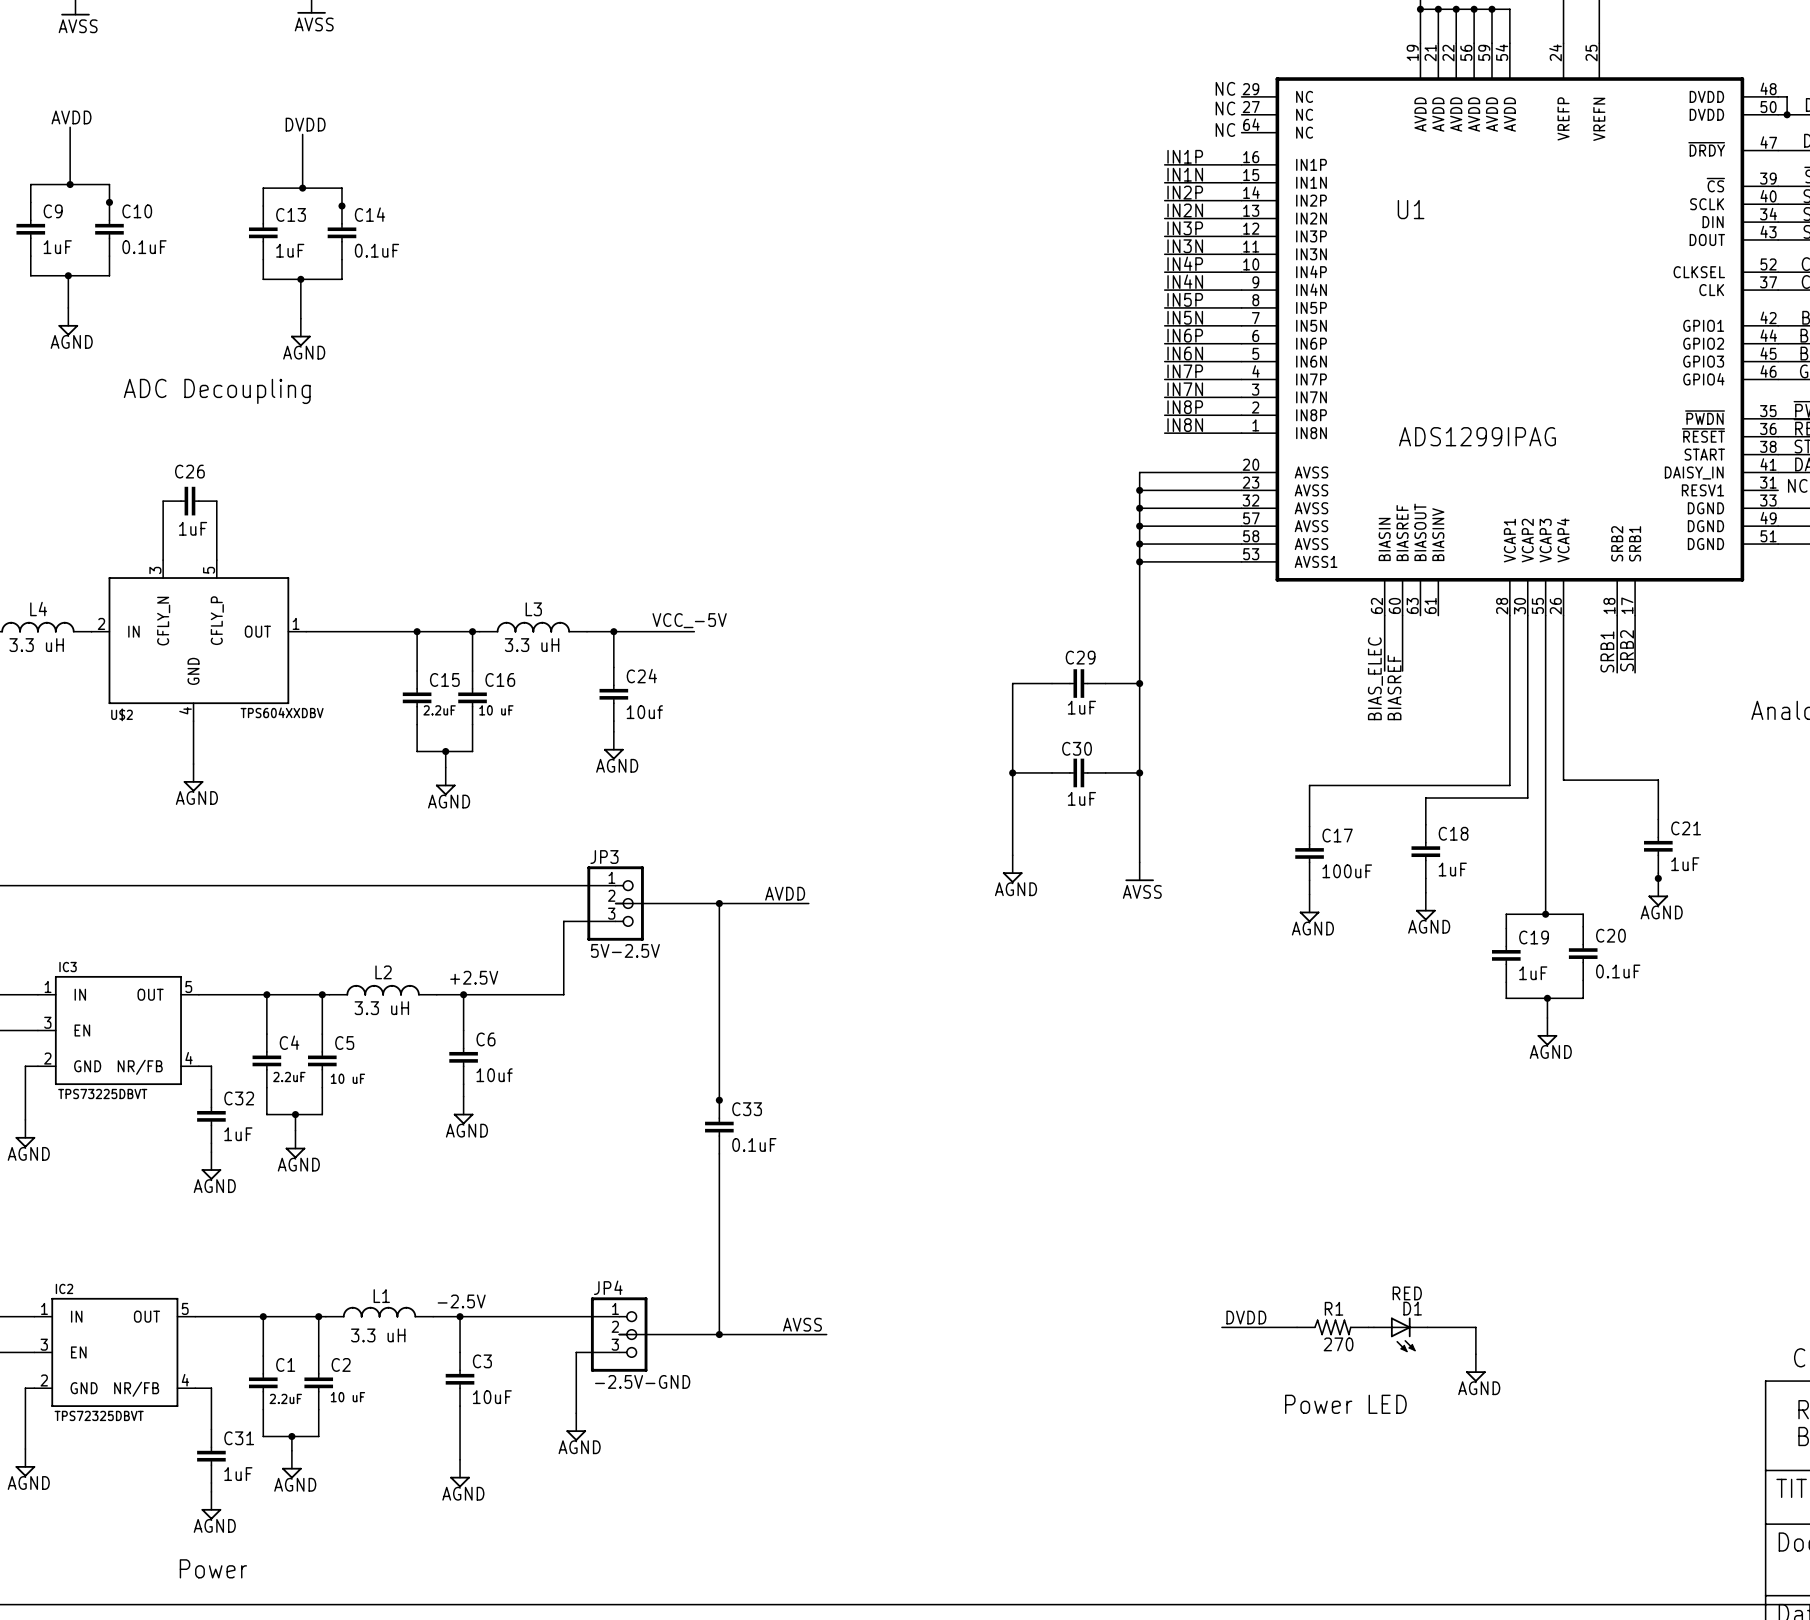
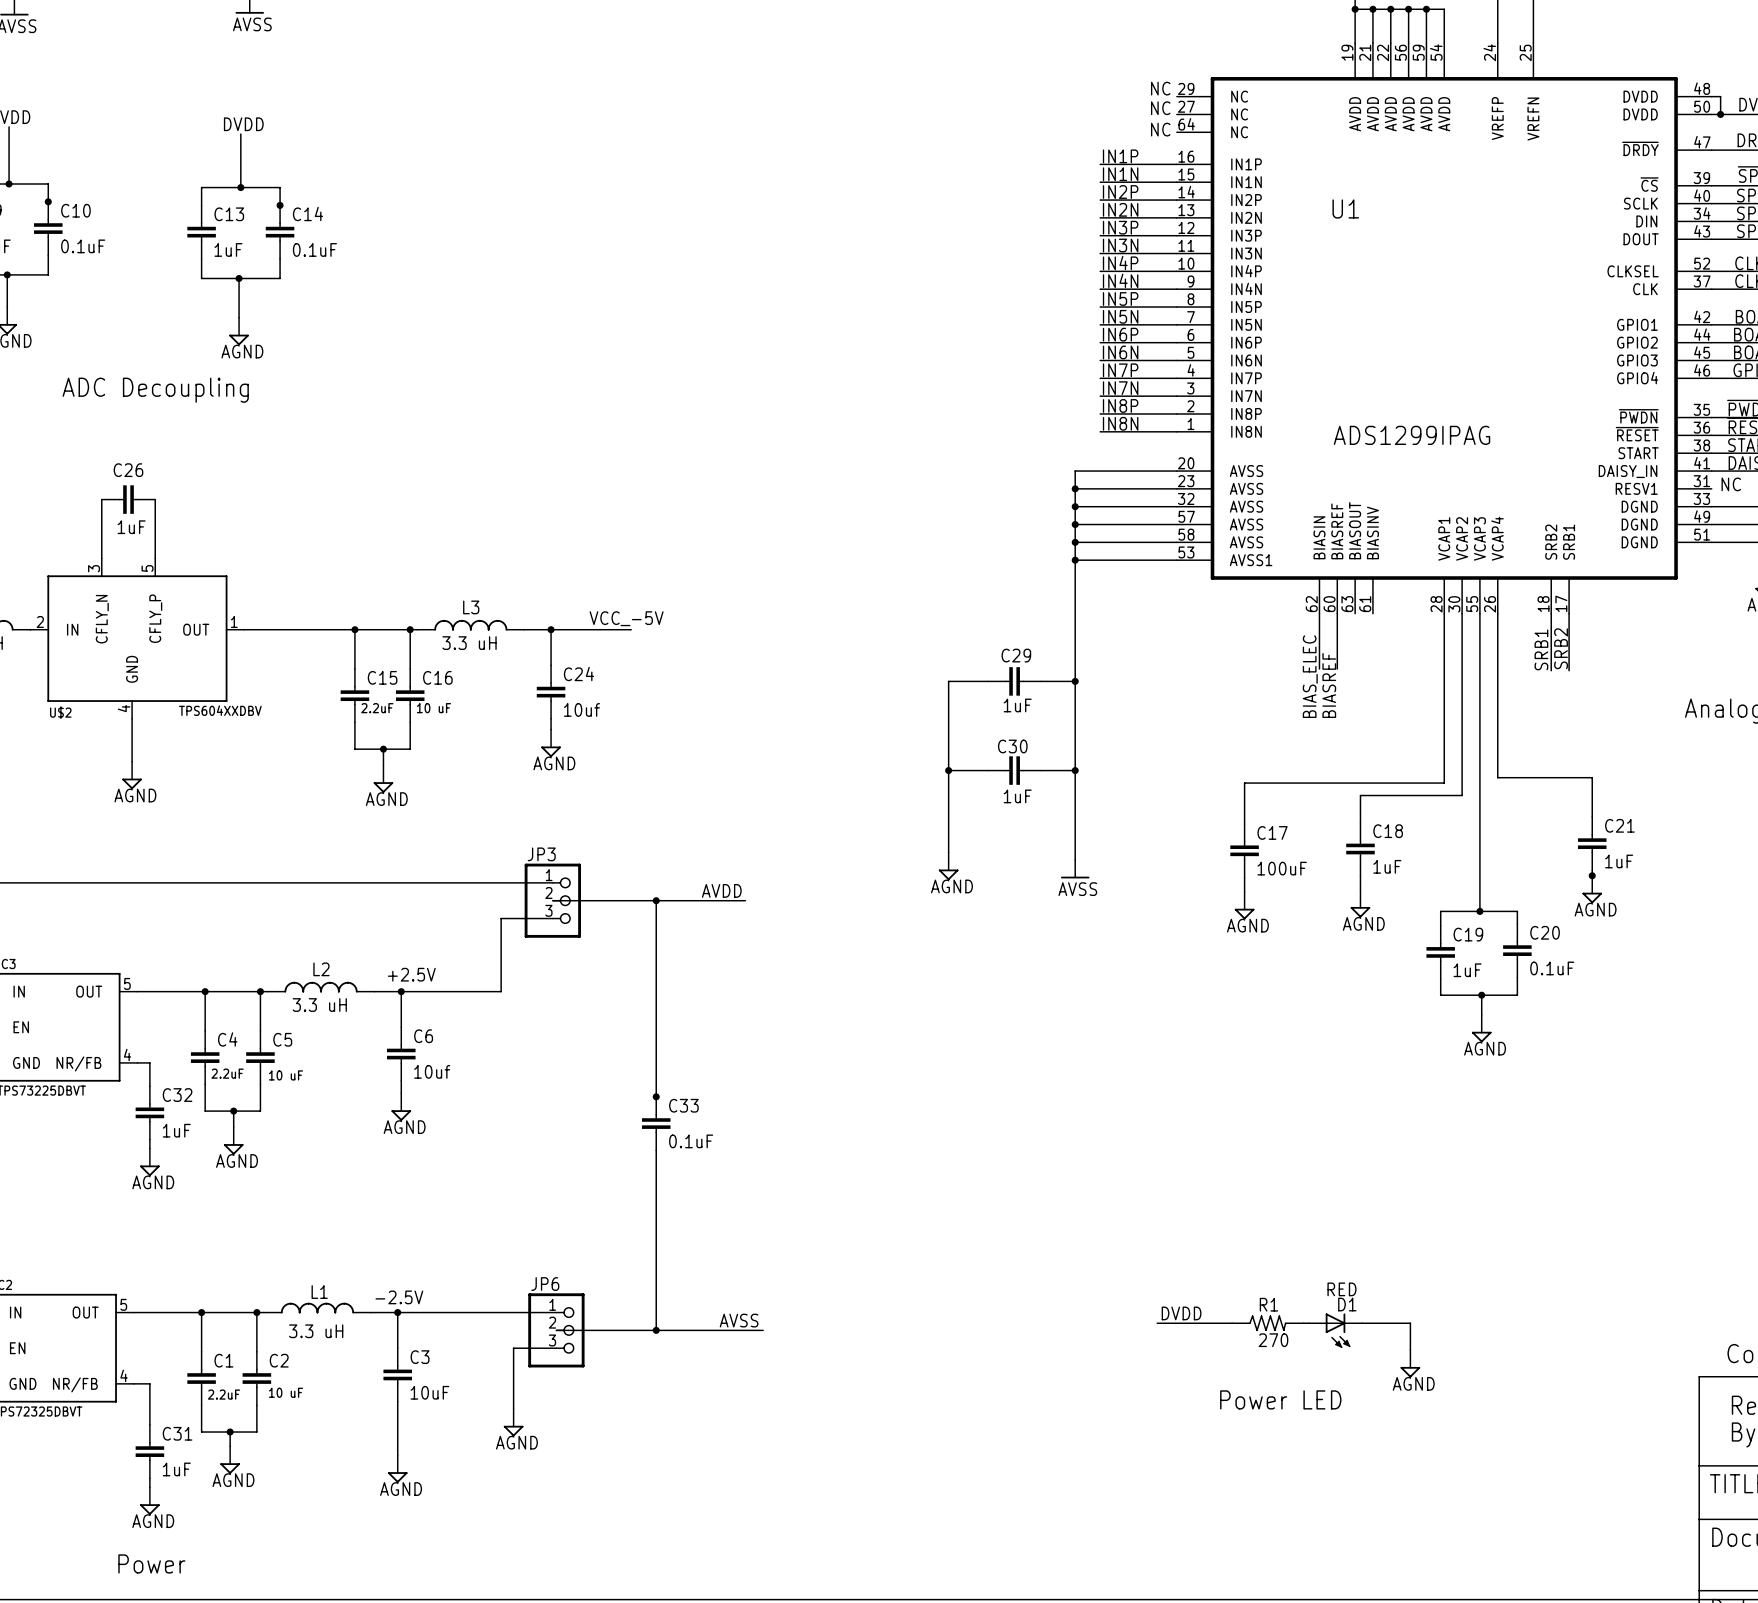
JP3 value: 5V-2.5V (625, 950) -> none
JP4 name: JP4 (608, 1287) -> JP6 (545, 1284)
JP4 value: -2.5V-GND (642, 1381) -> none

